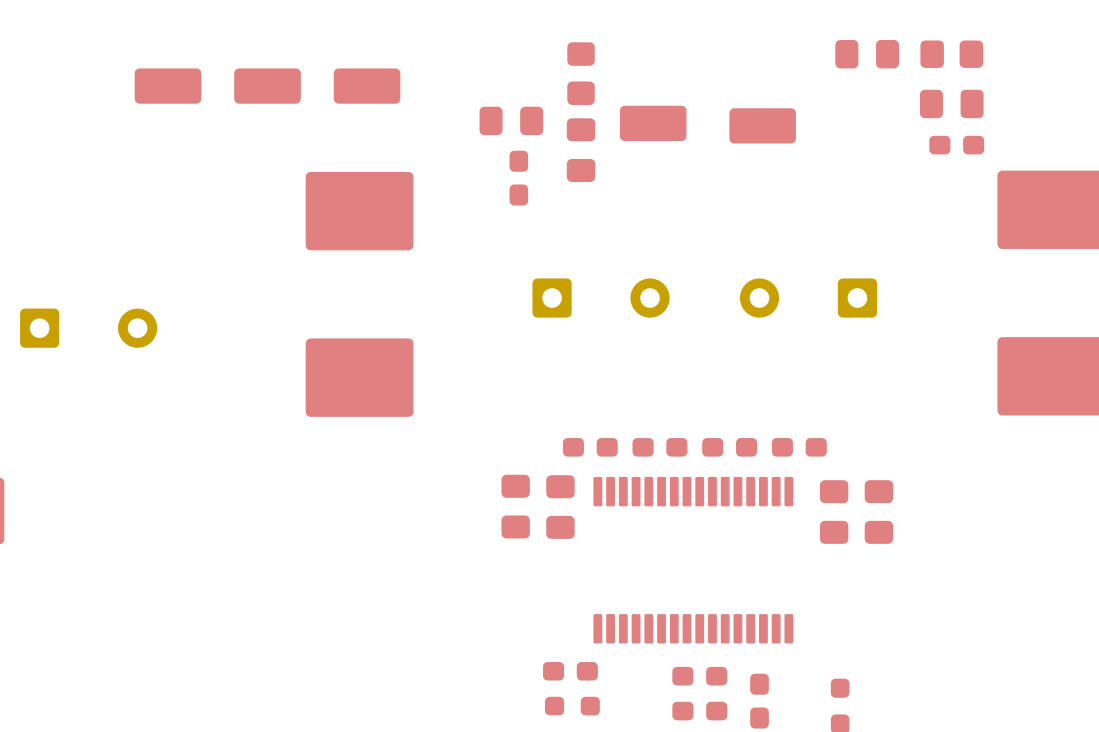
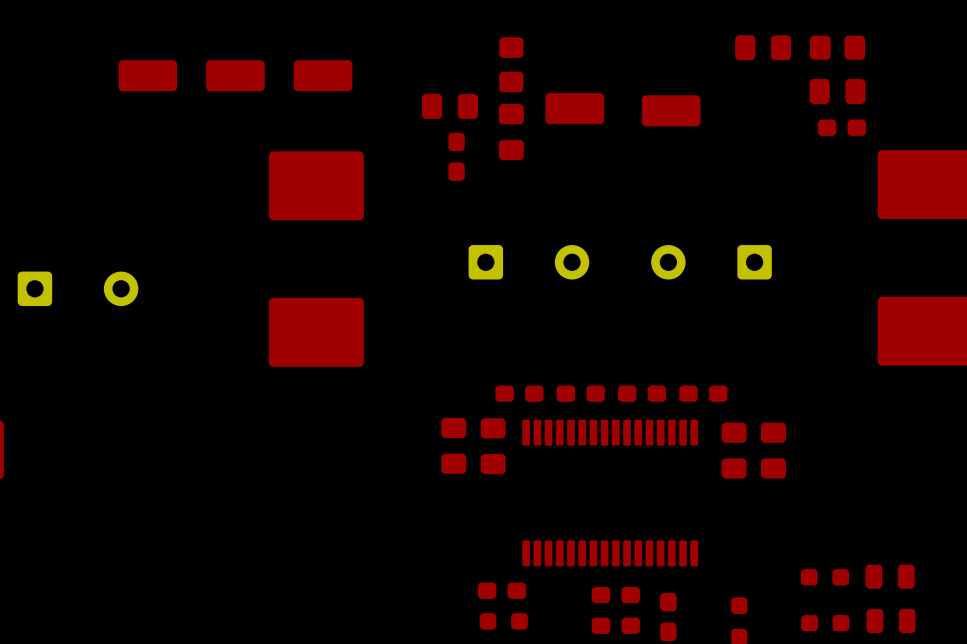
part: none -> (890, 576)
part: none -> (824, 577)
part: none -> (891, 621)
part: none -> (825, 623)

